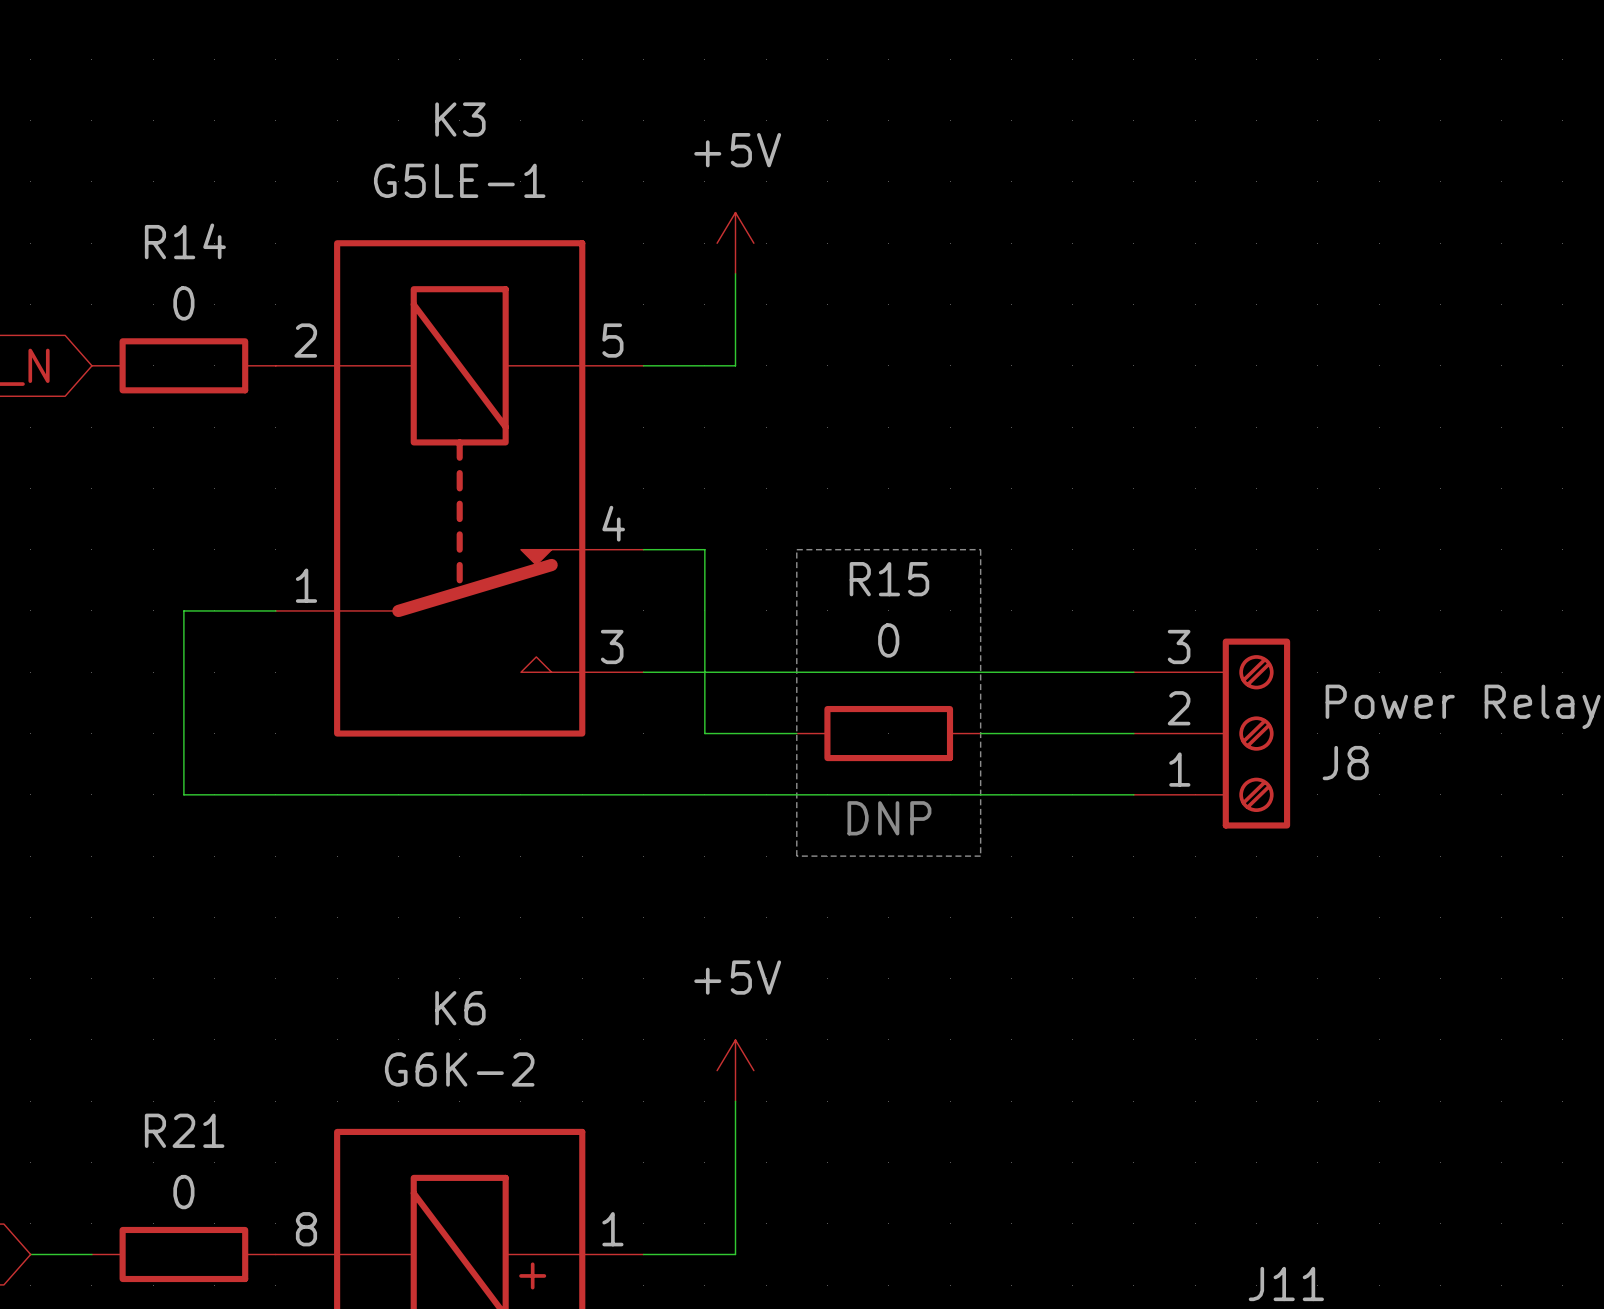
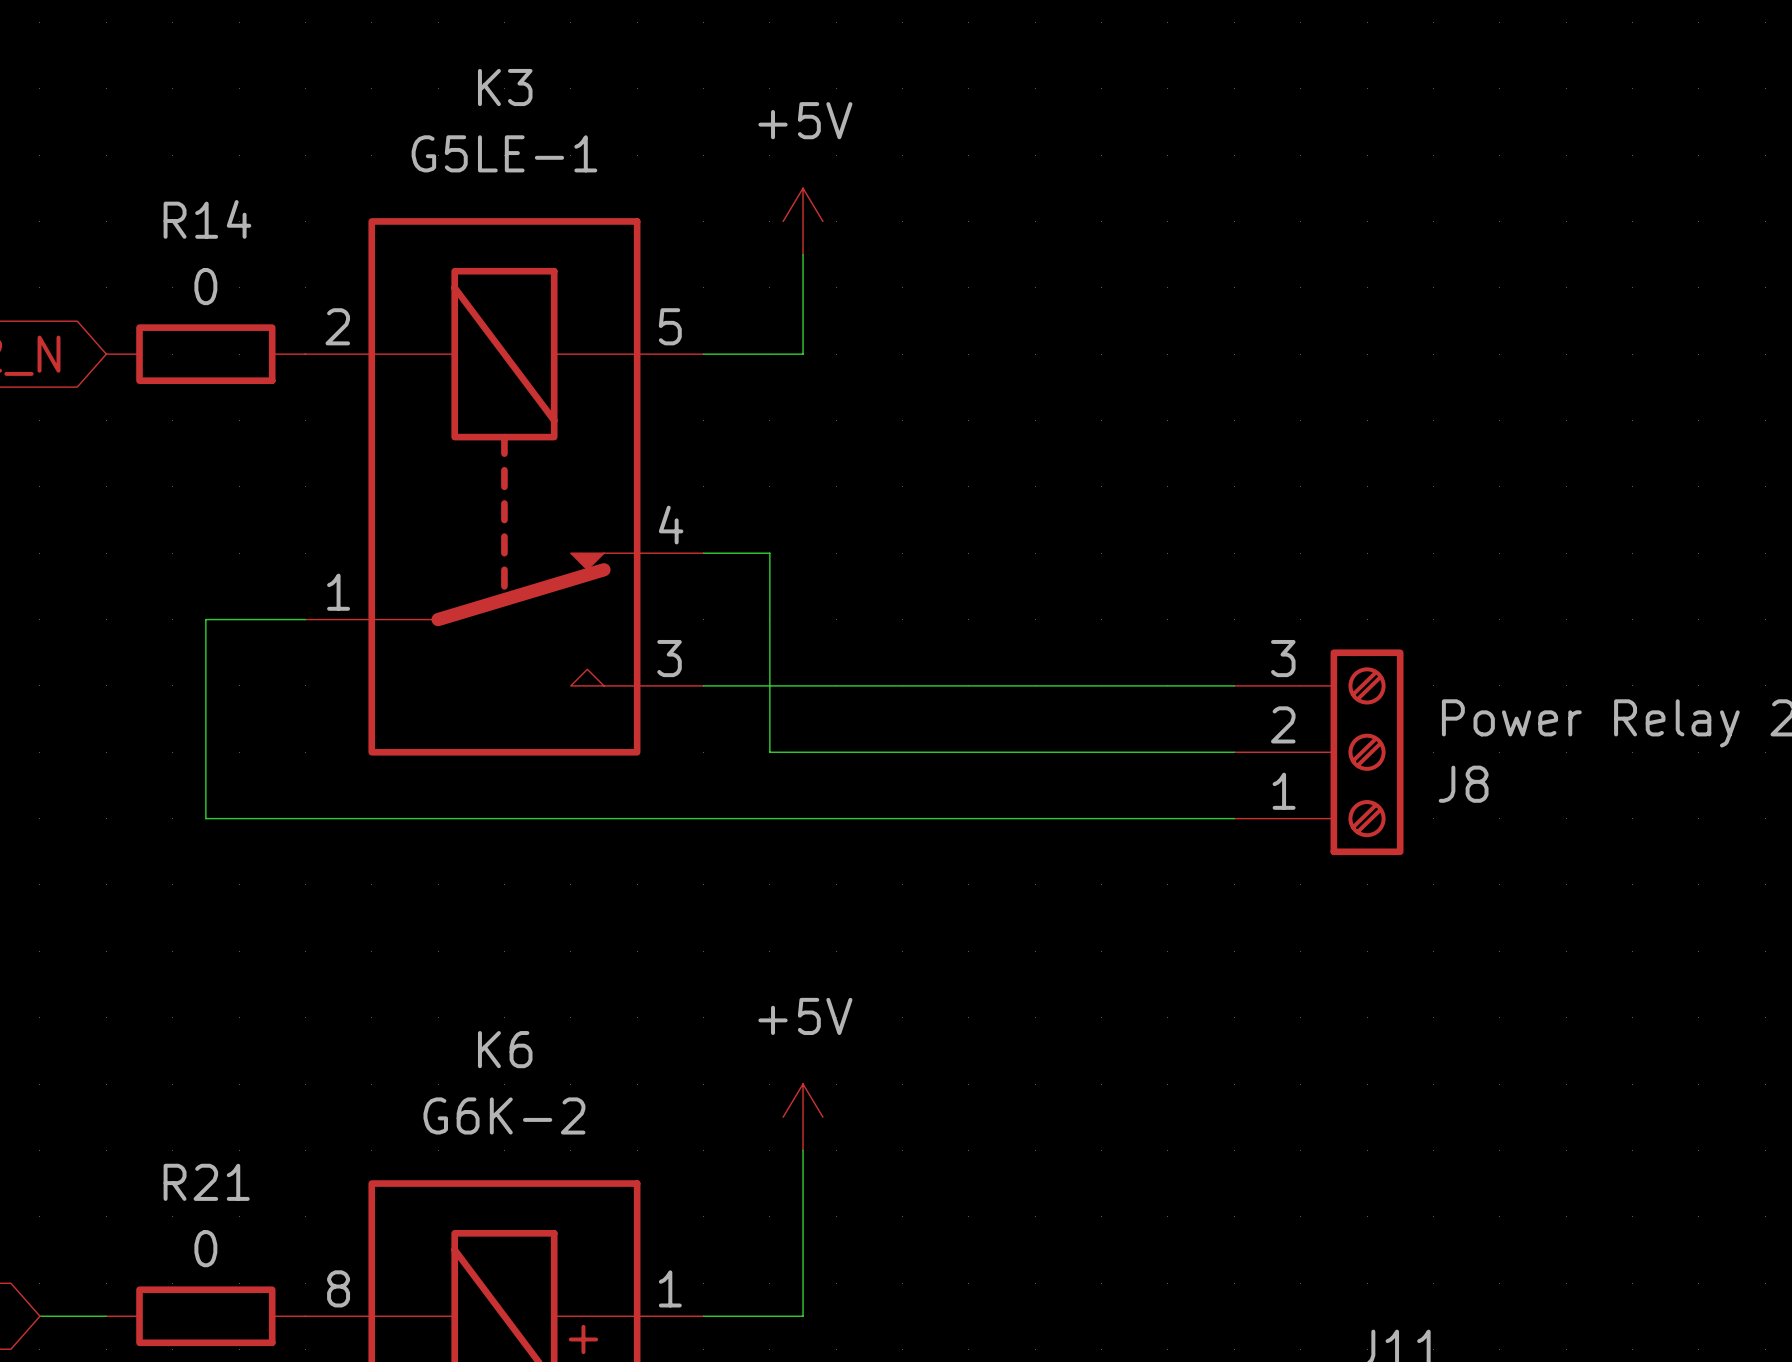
line: (796, 549) (980, 549) (980, 856) (796, 856) (796, 549) -> none
wire: none -> (869, 752) (1068, 752)
R15: 0 (888, 733) -> none
text: DNP (889, 818) -> none

